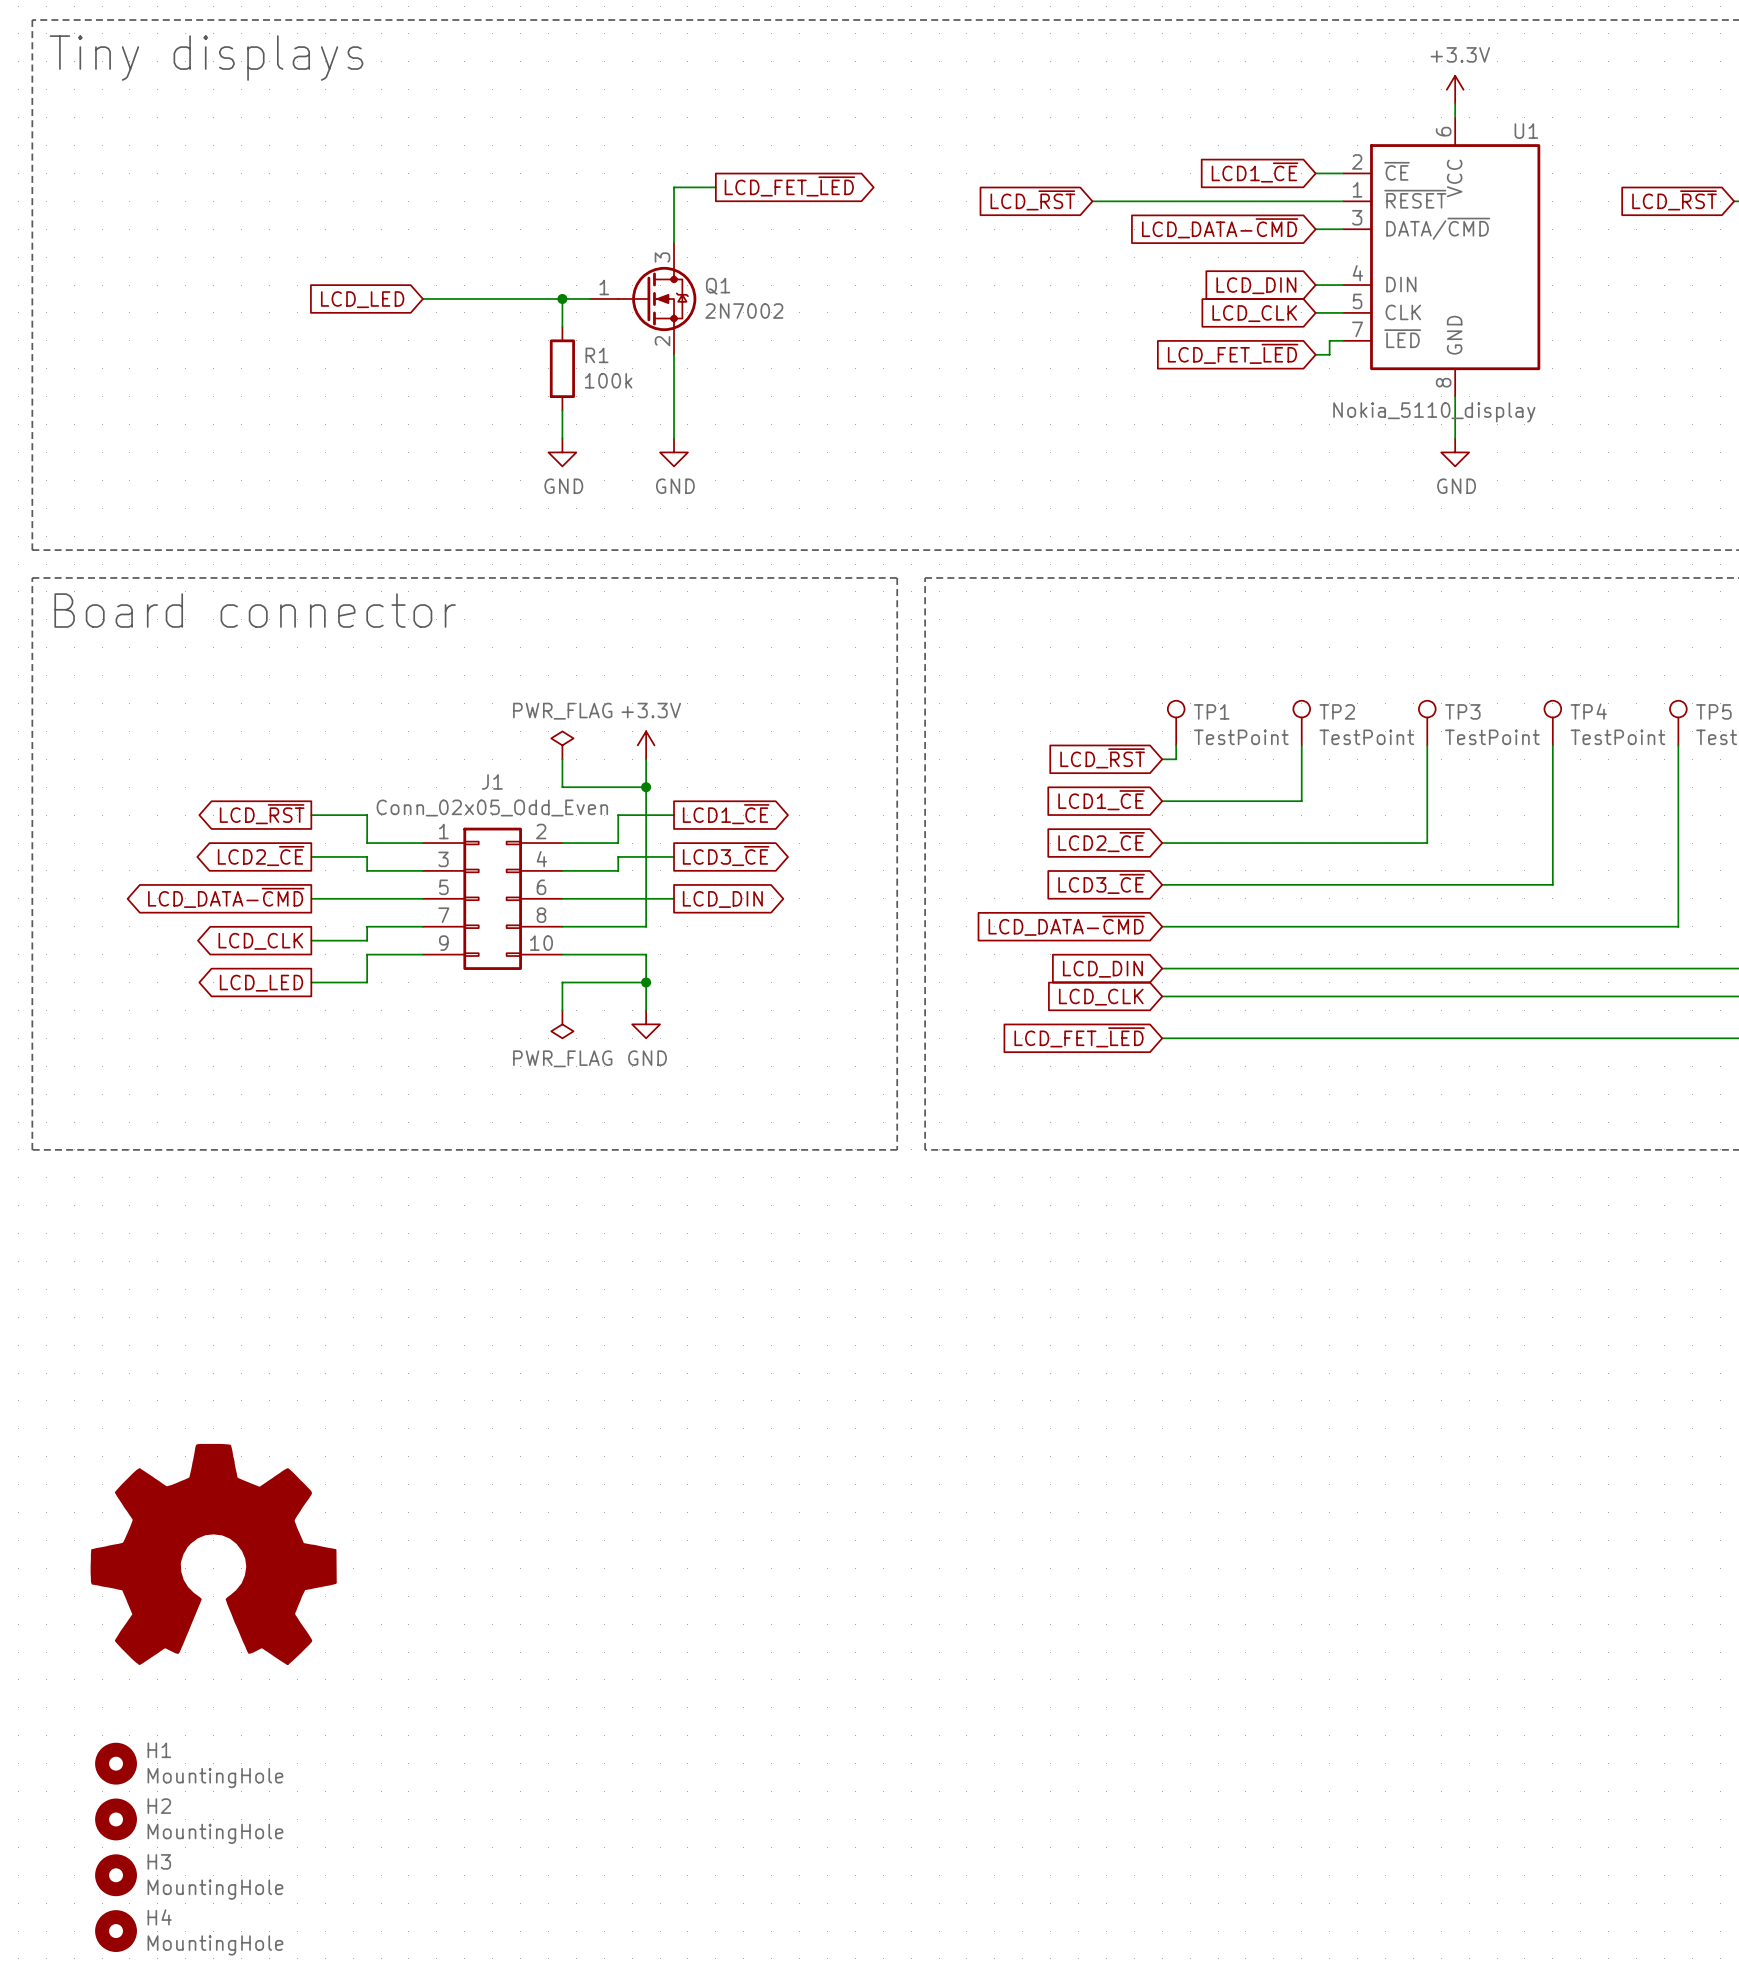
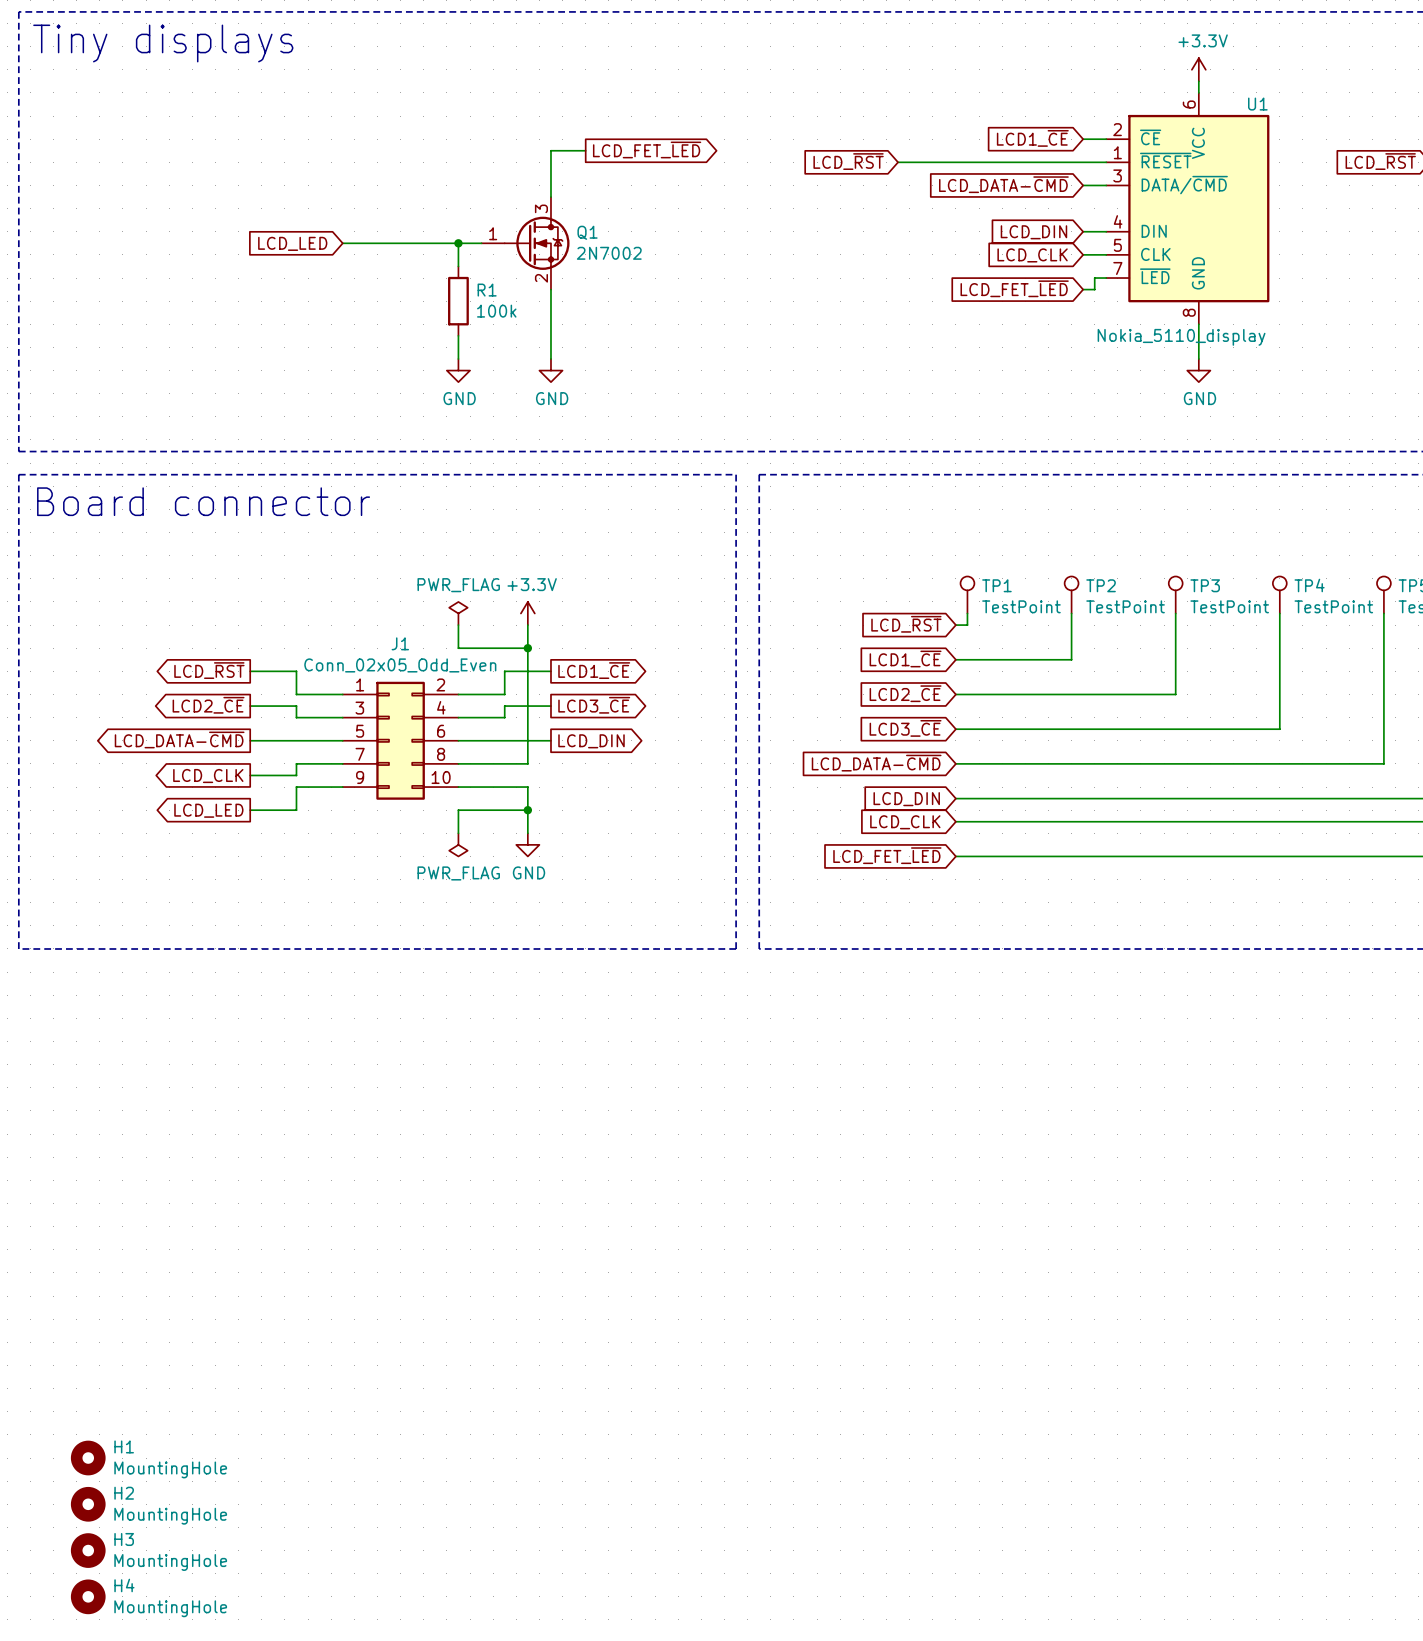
part: (213, 1554) -> none

